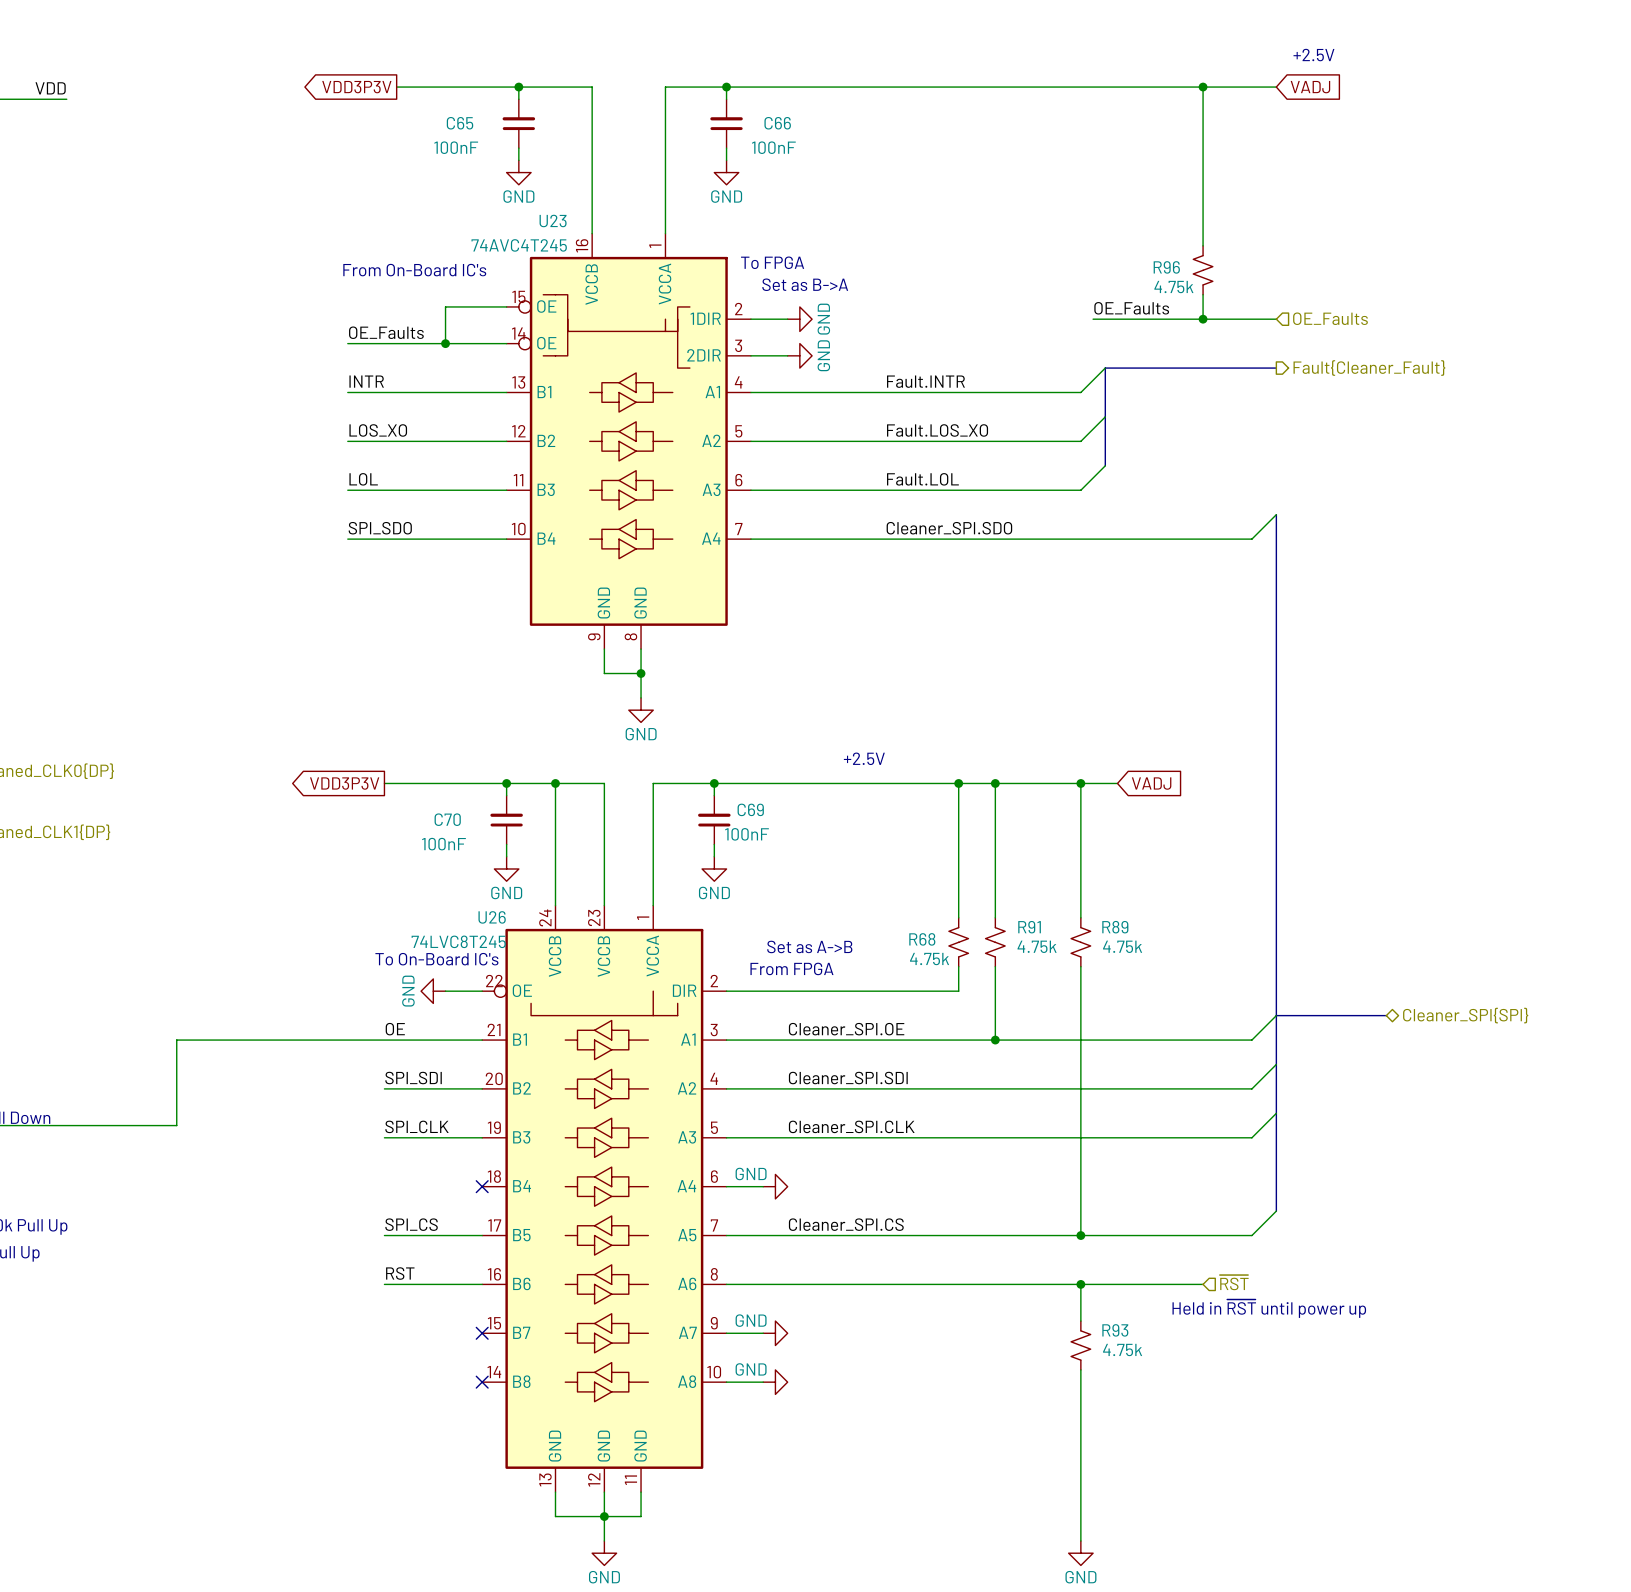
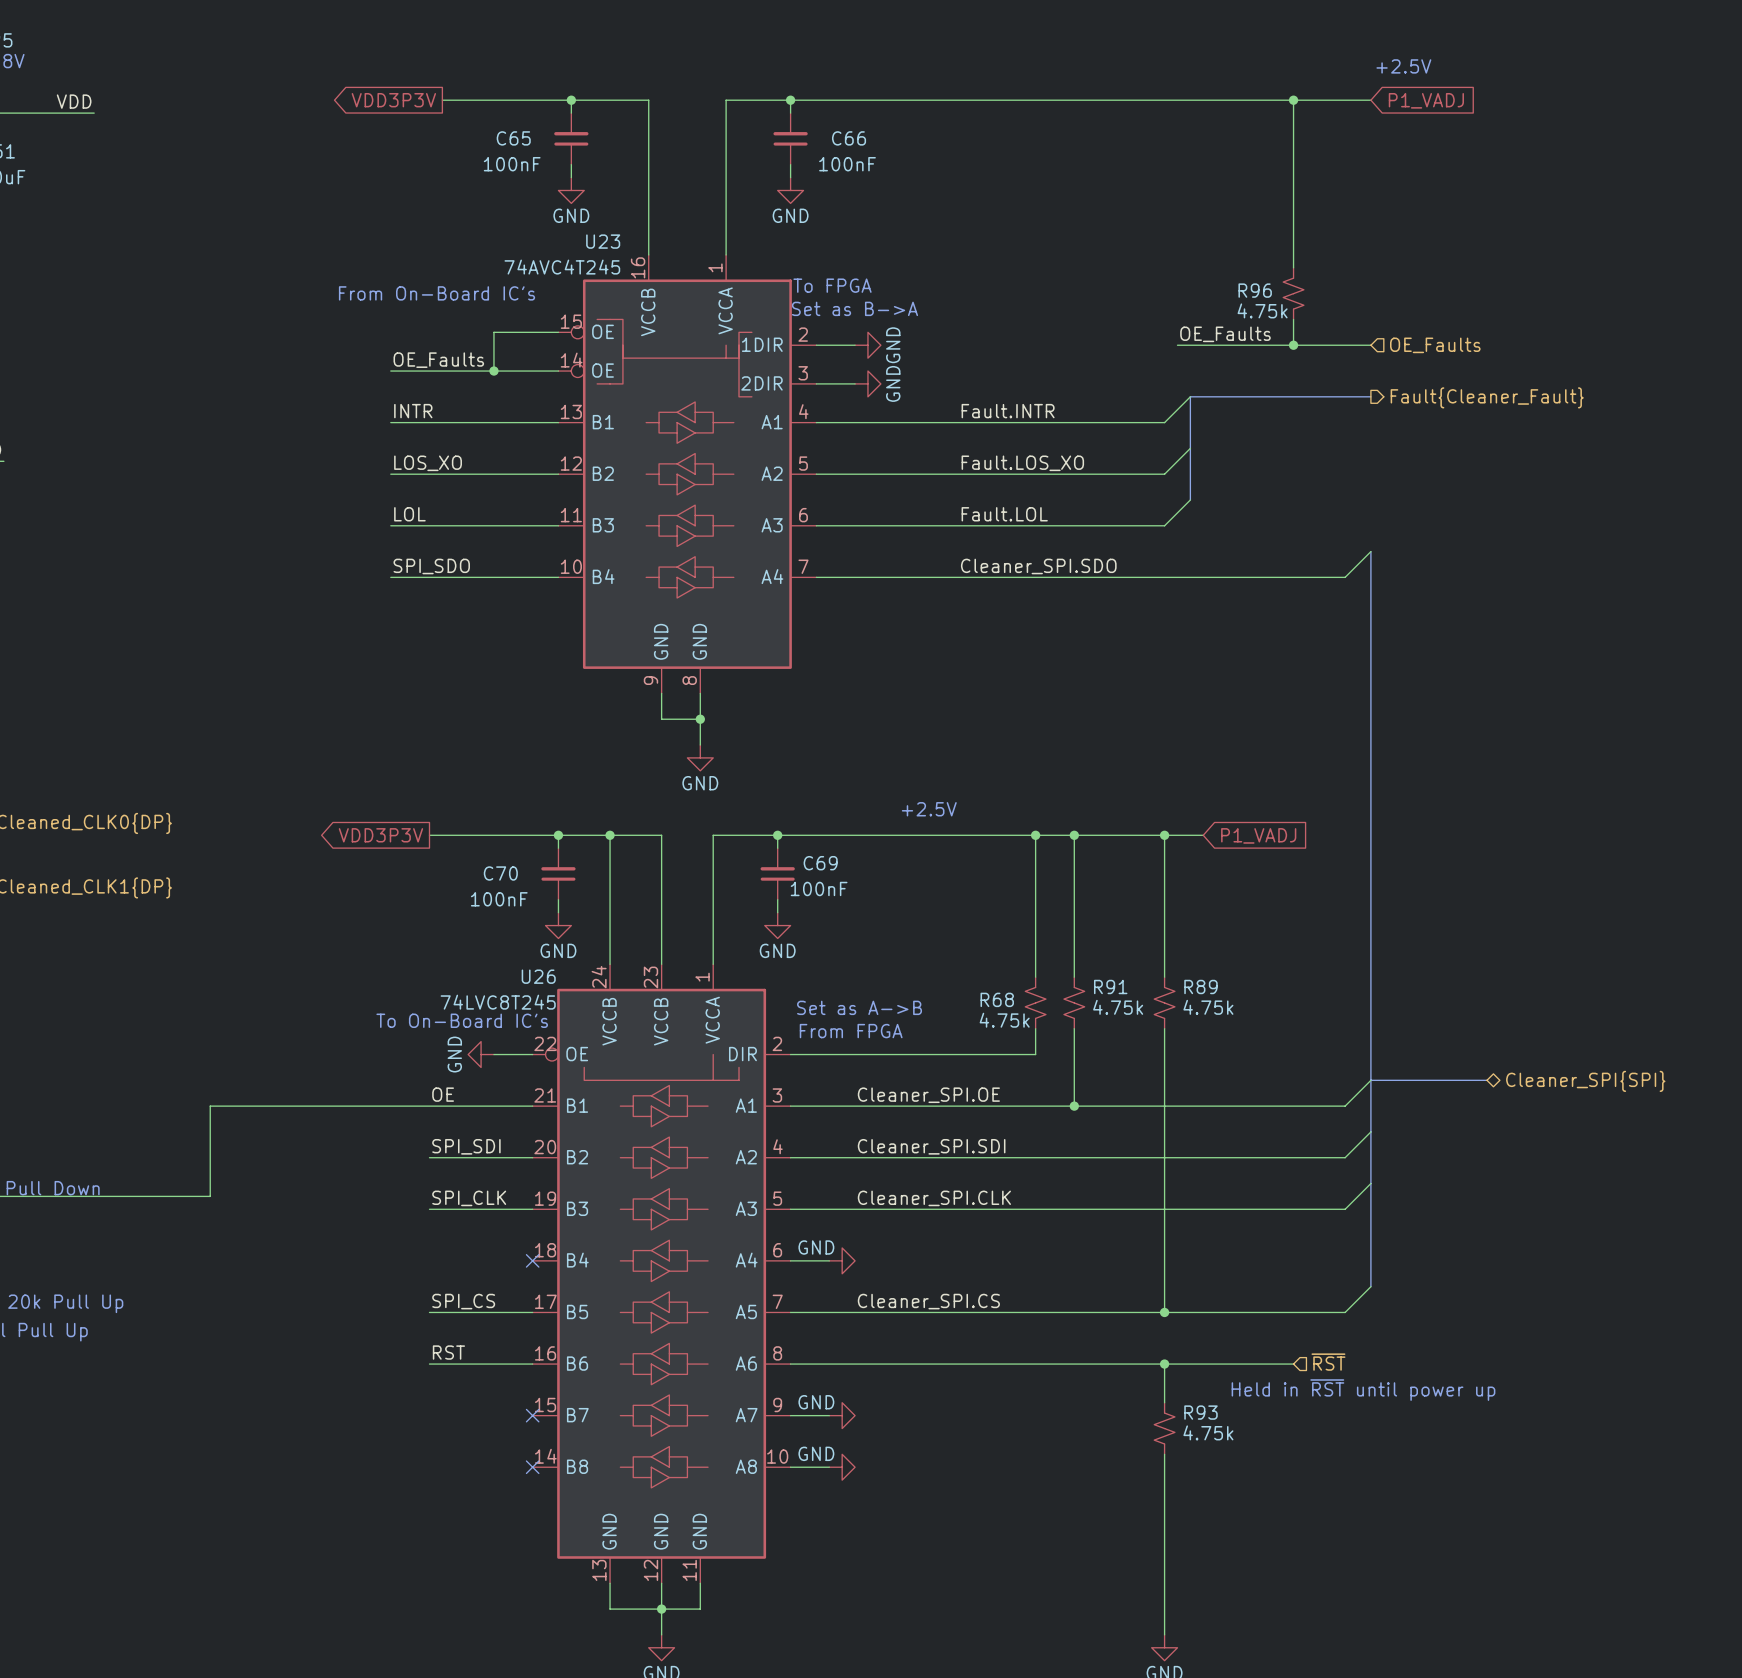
global label: VADJ (1310, 87) -> P1_VADJ (1426, 100)
global label: VADJ (1151, 783) -> P1_VADJ (1258, 835)

